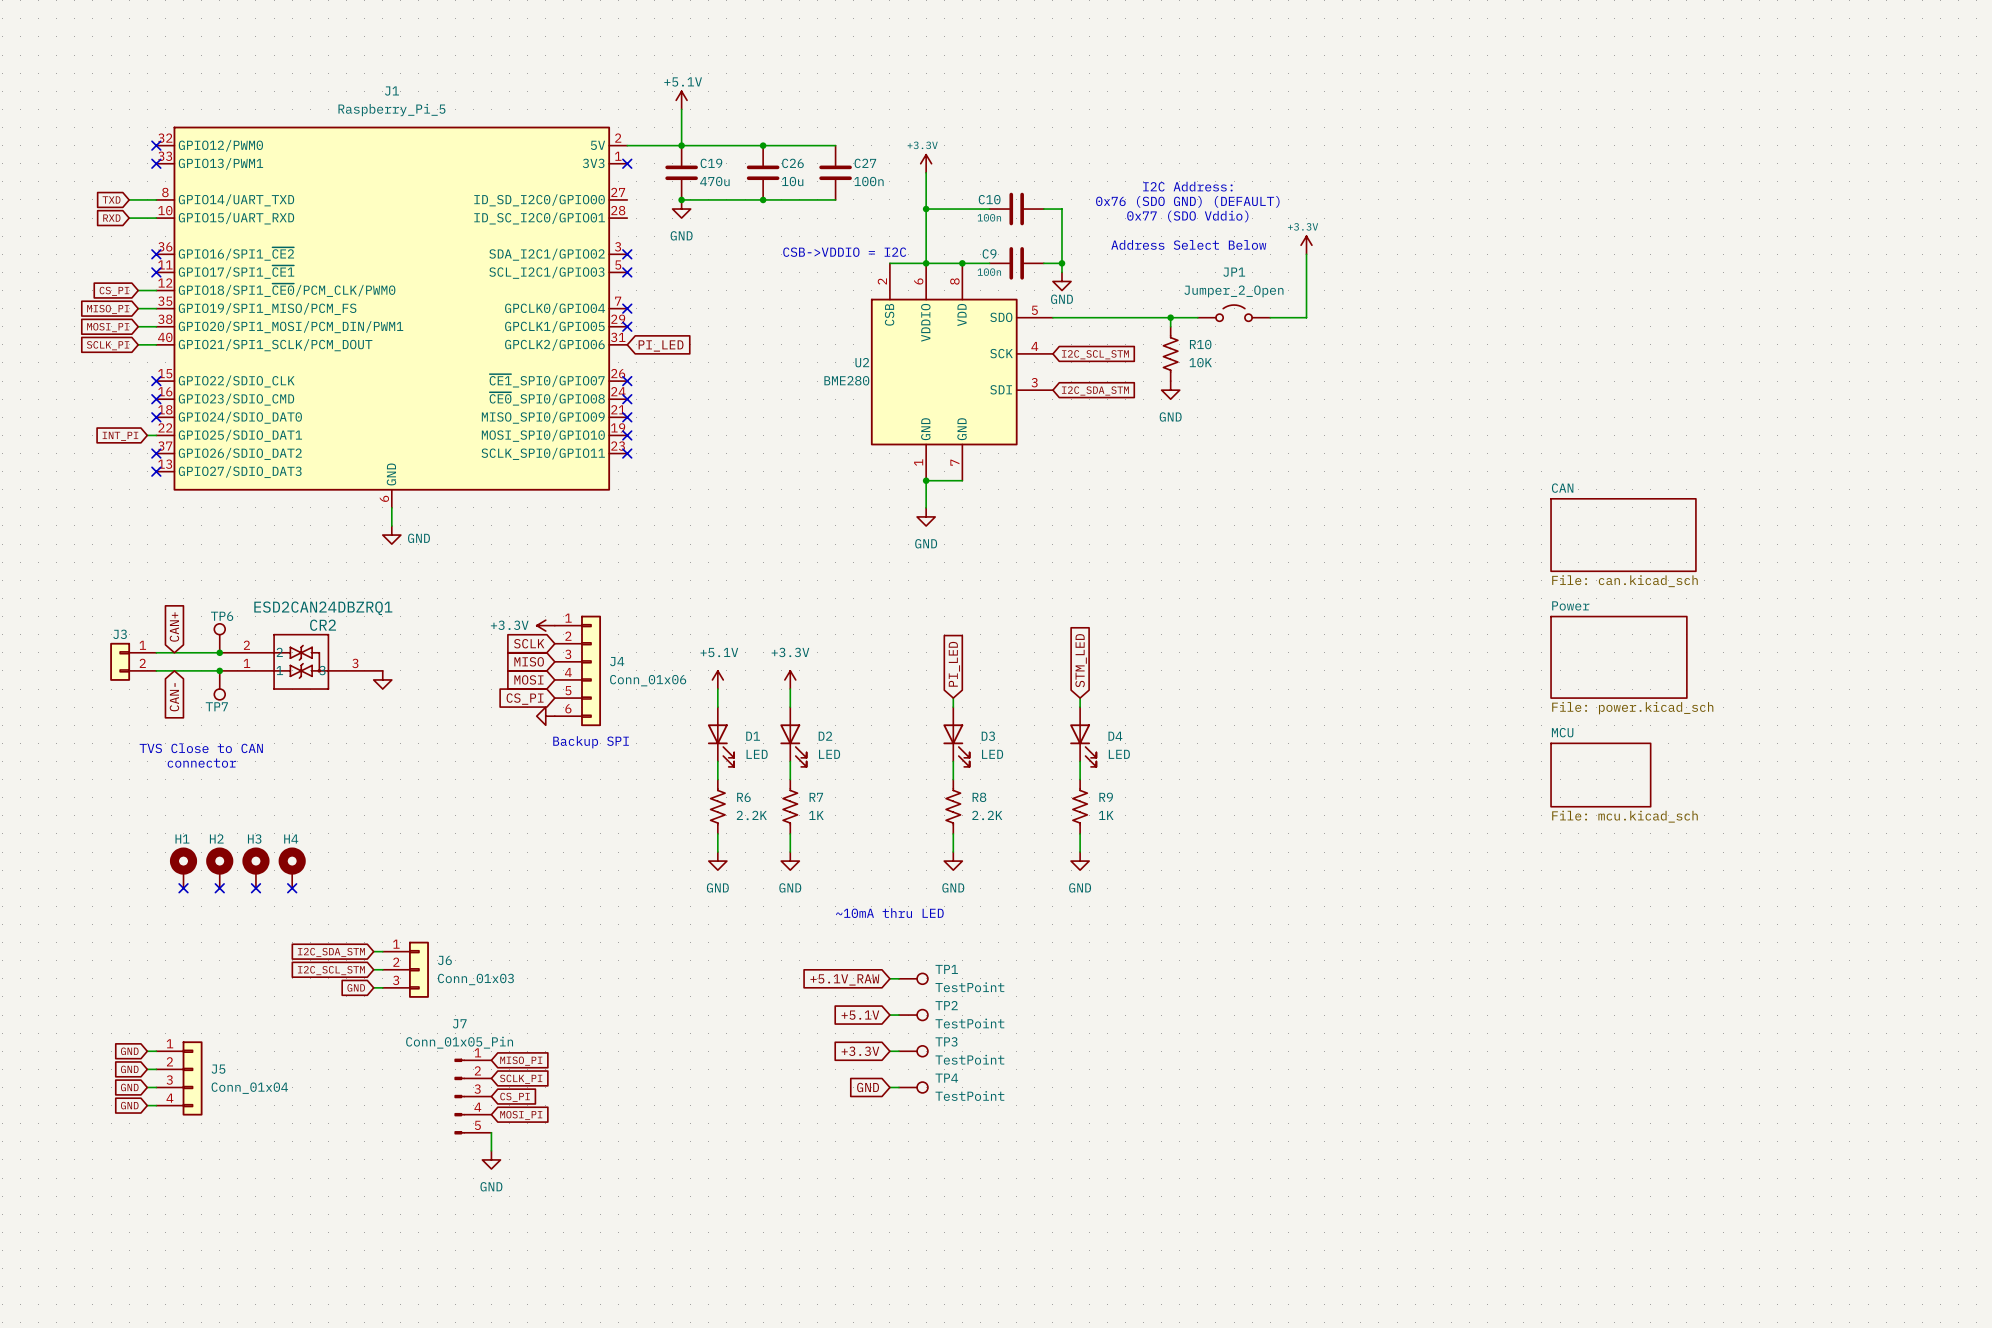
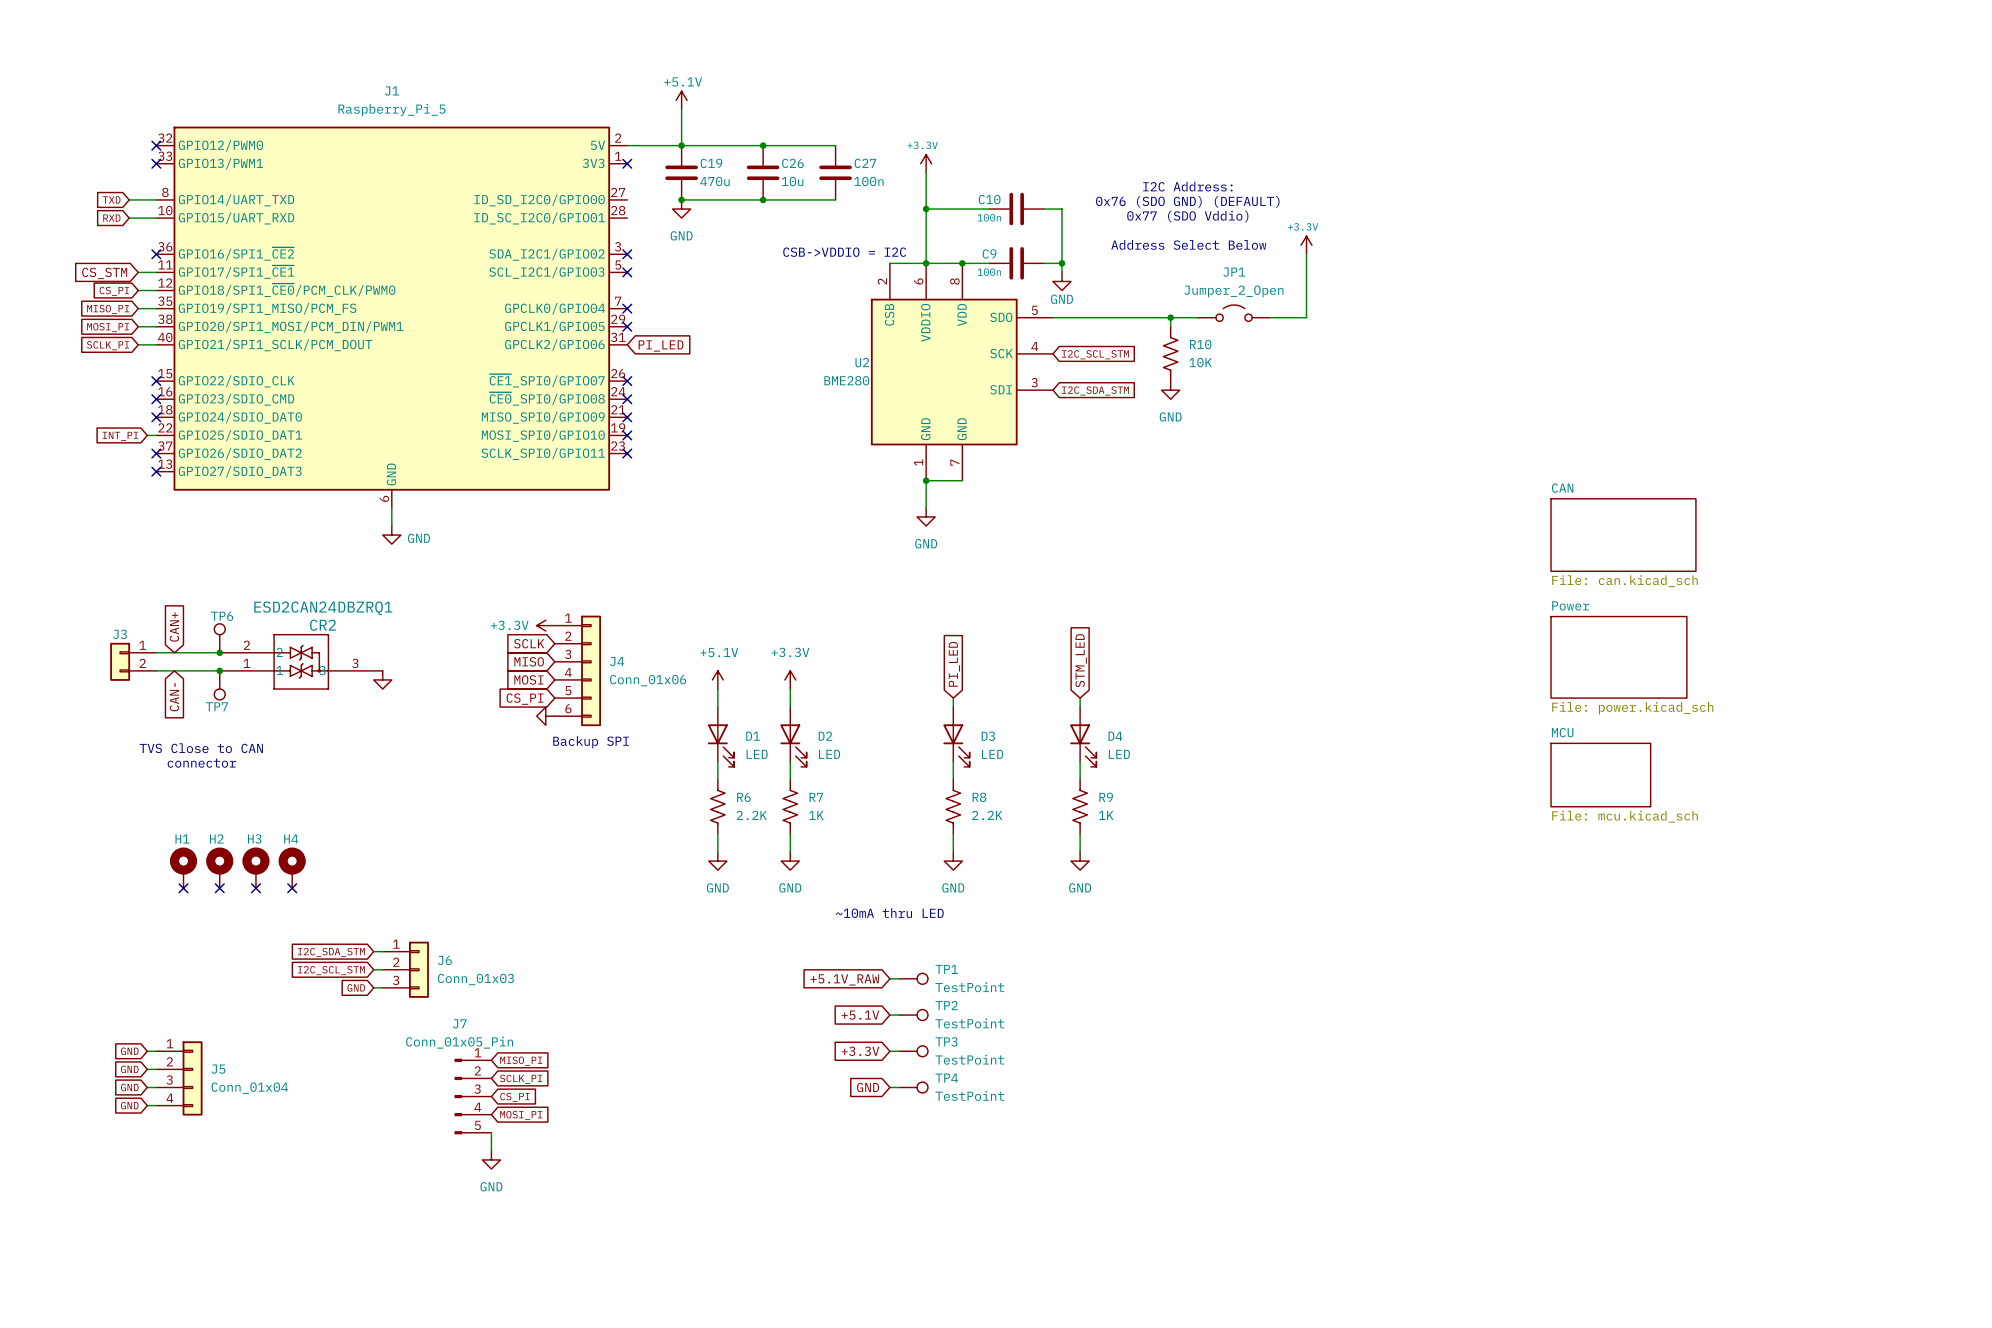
wire: none -> (138, 272) (156, 272)
no-connect mark: (156, 272) -> none
global label: none -> CS_STM (104, 273)

